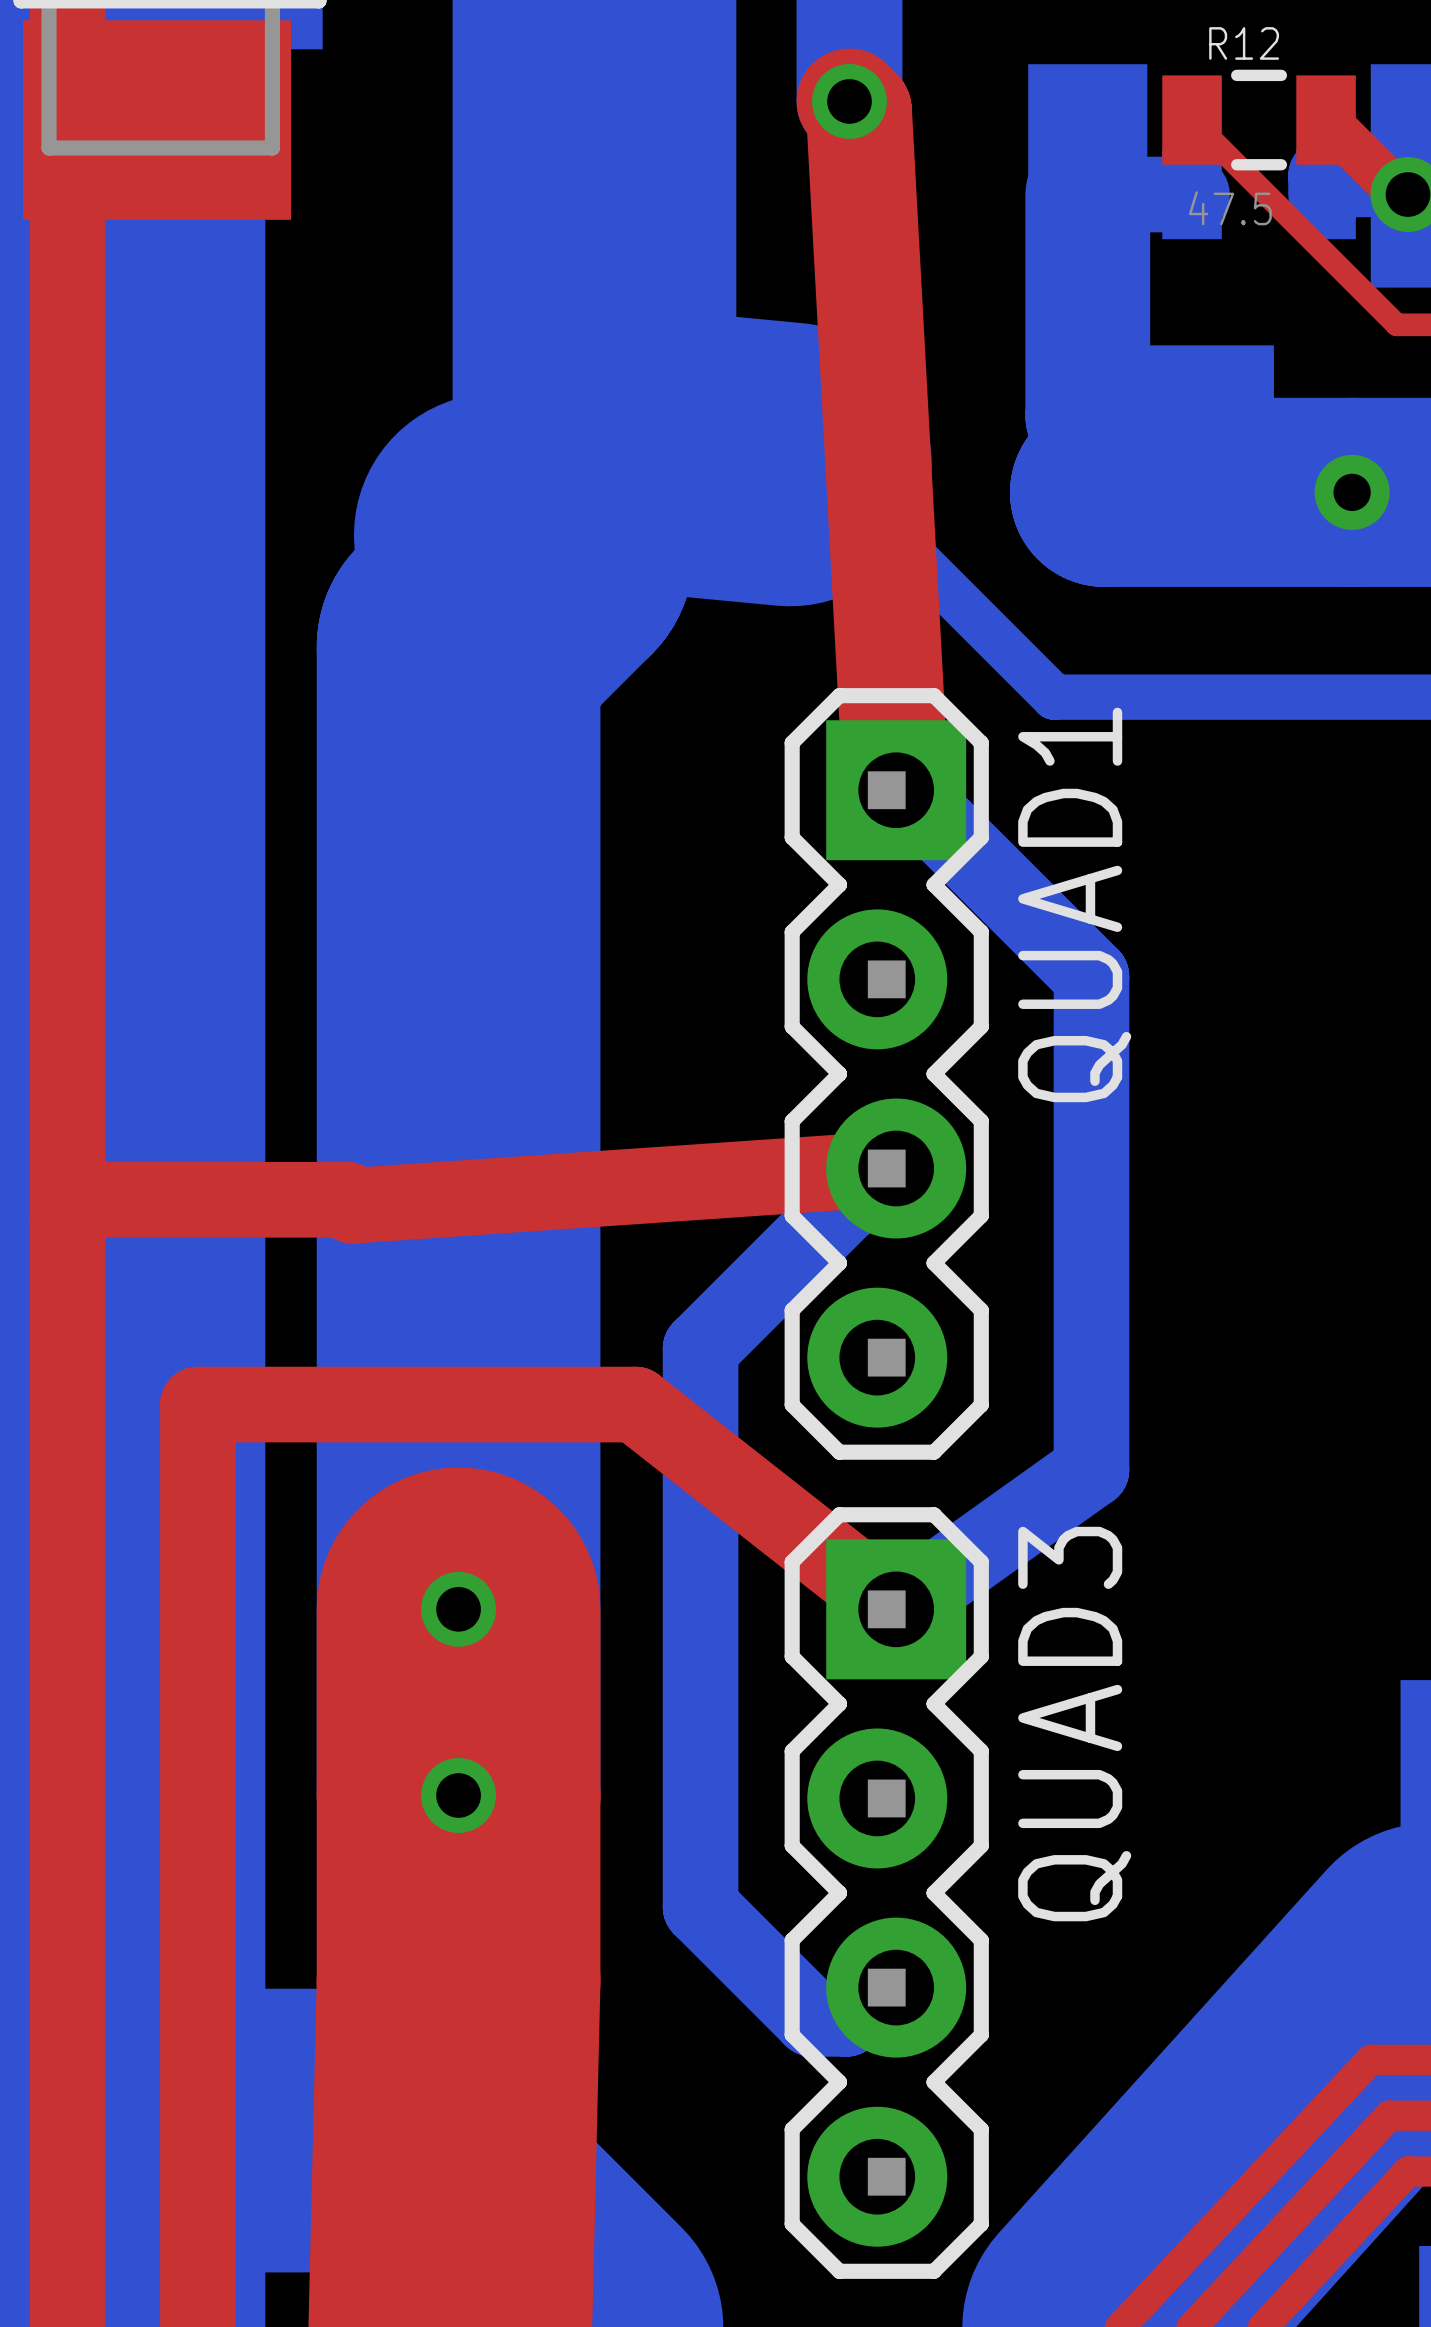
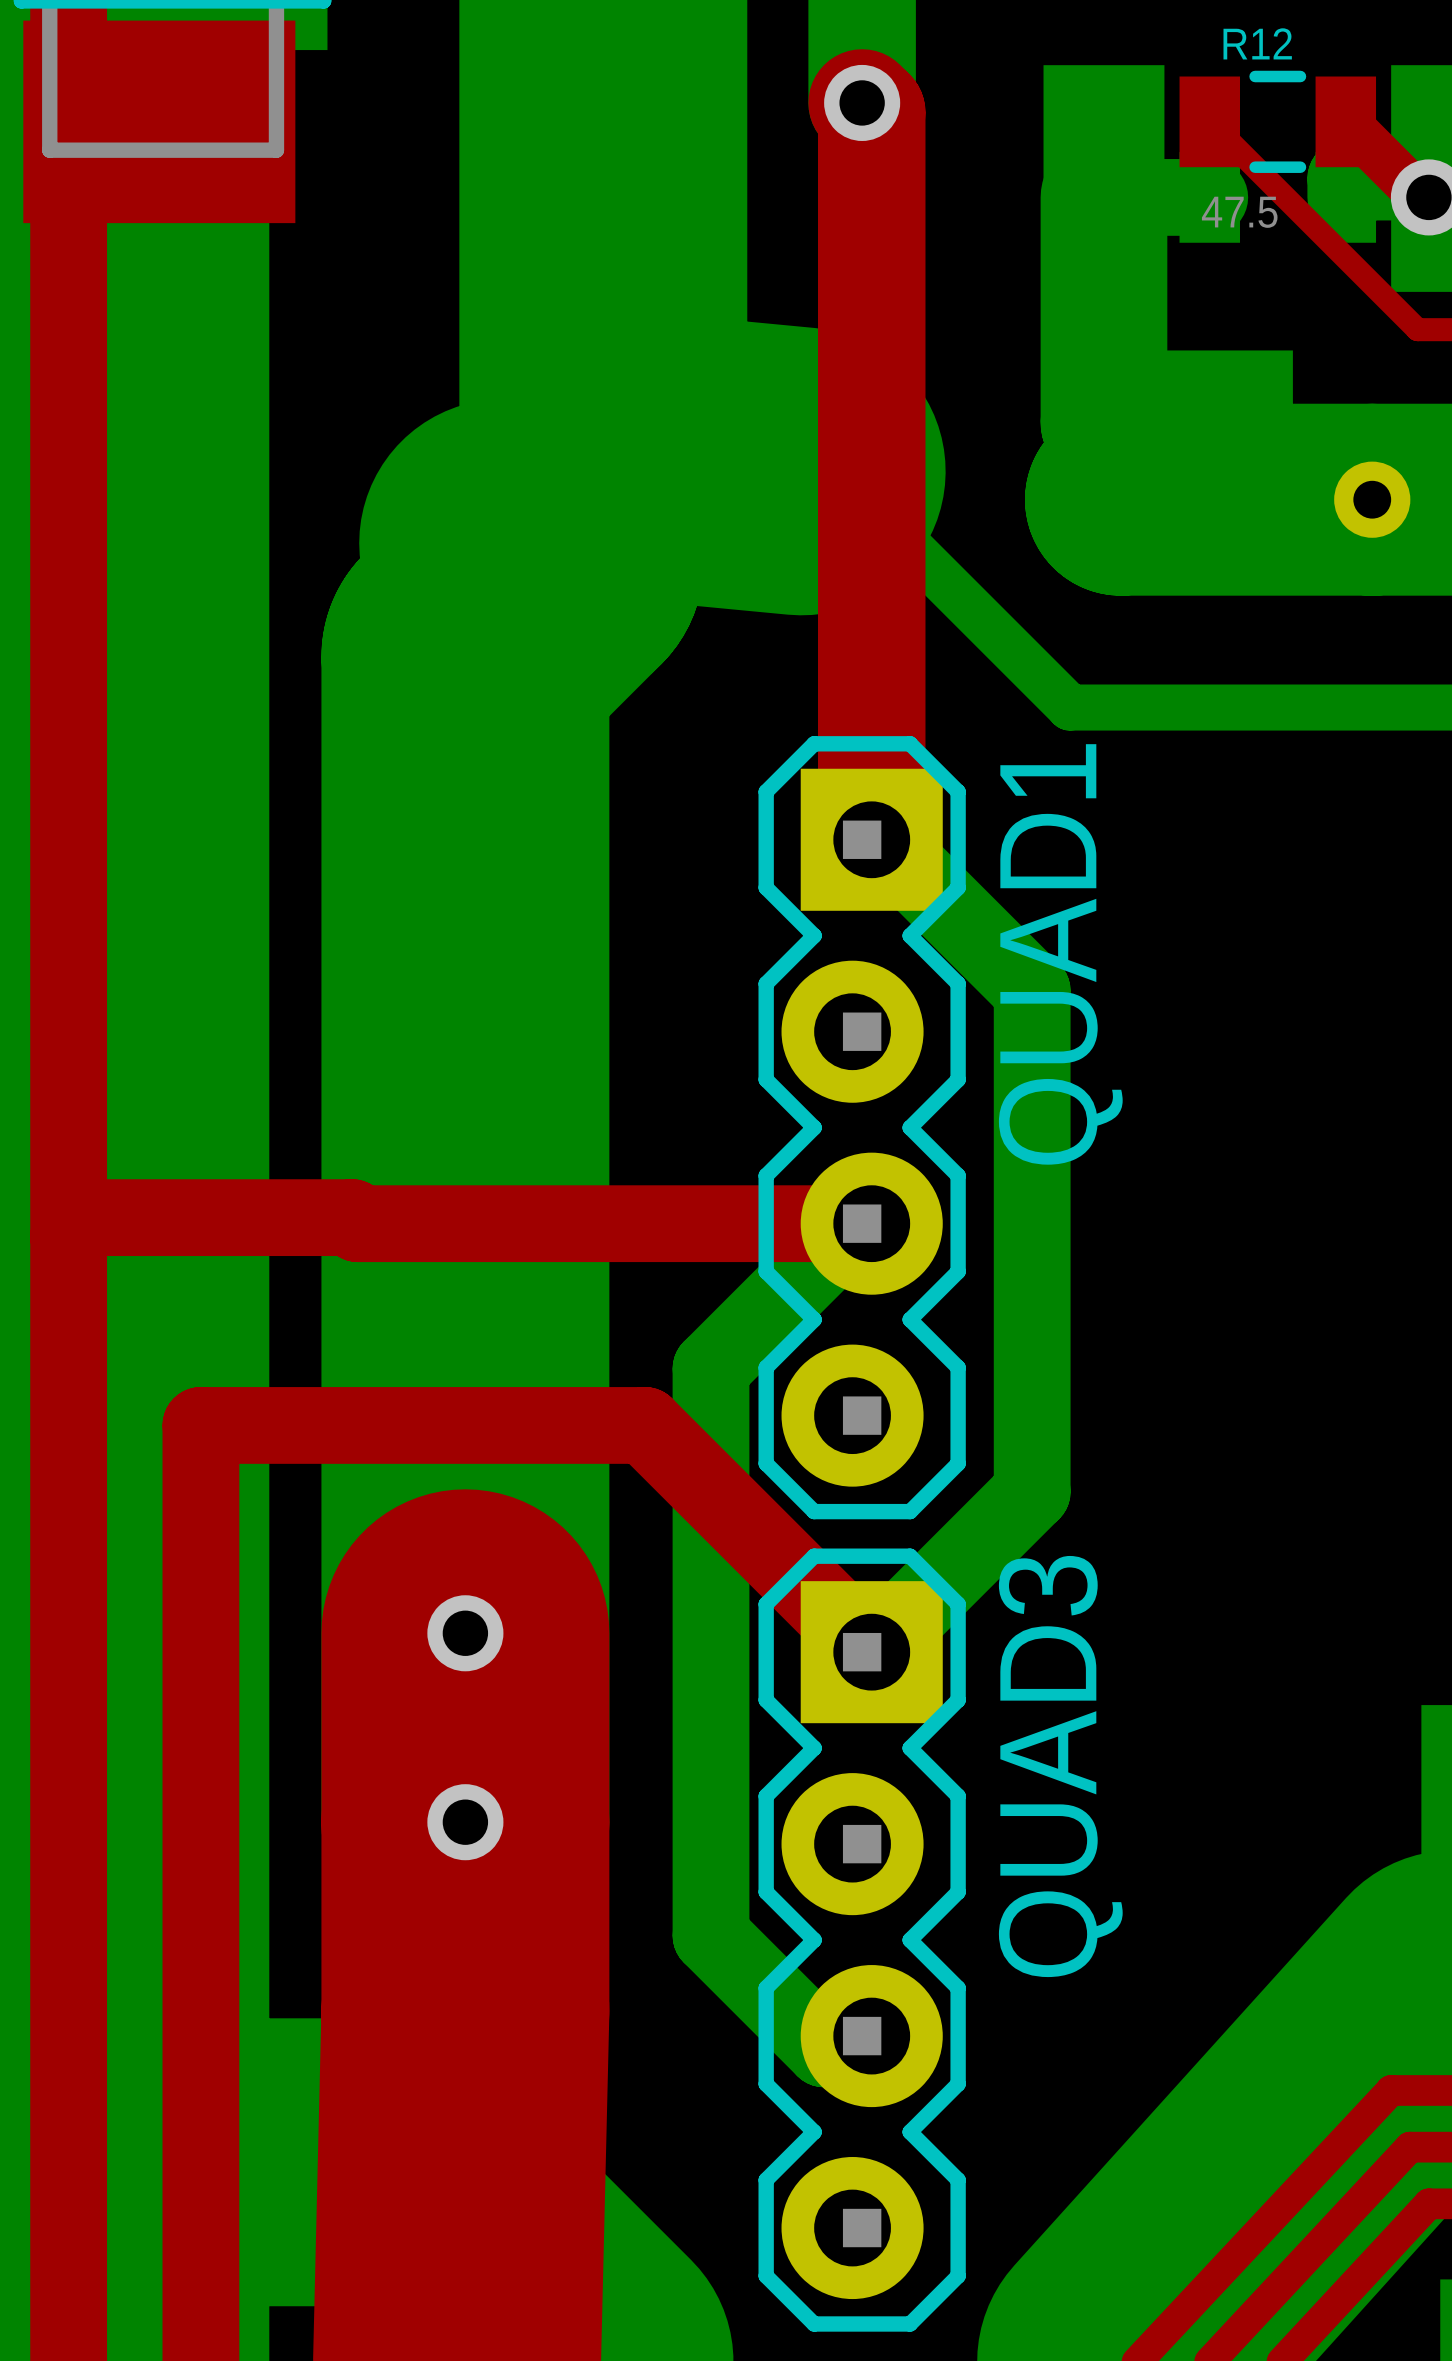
top track: (858, 110) (896, 790) (914, 771) -> (871, 112) (871, 839) (852, 858)
bottom track: (896, 790) (942, 827) (1091, 976) (1091, 1469) (896, 1609) -> none
bottom track: none -> (871, 839) (881, 839) (1032, 990) (1032, 1491) (871, 1652)
QUAD1 position: (886, 1073) -> (862, 1127)
top track: (896, 1168) (352, 1205) -> (871, 1223) (358, 1223)
top track: (635, 1404) (896, 1609) -> (645, 1425) (871, 1652)
QUAD3 position: (886, 1893) -> (862, 1940)

